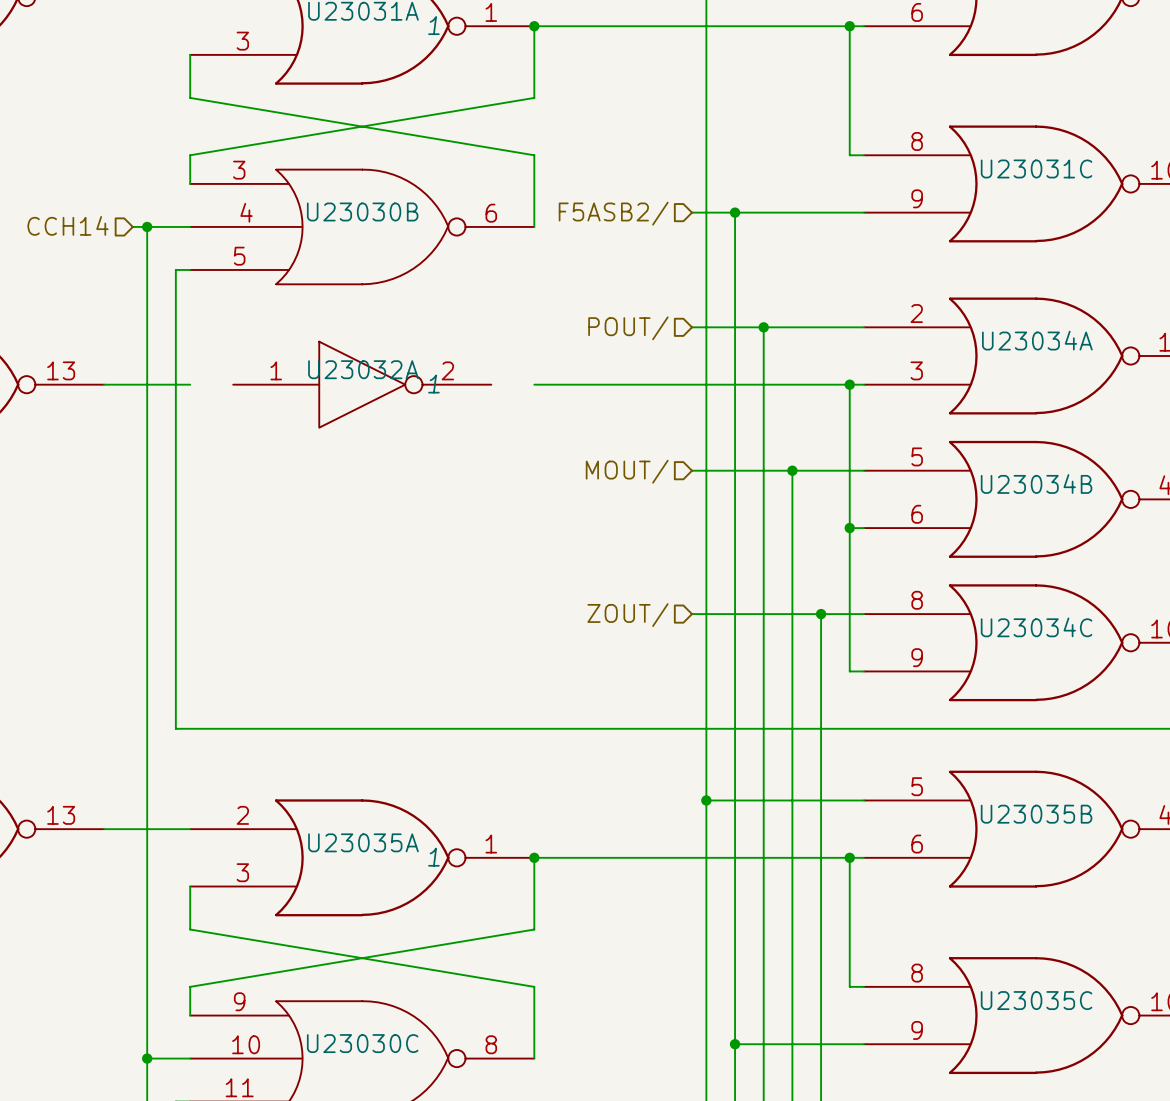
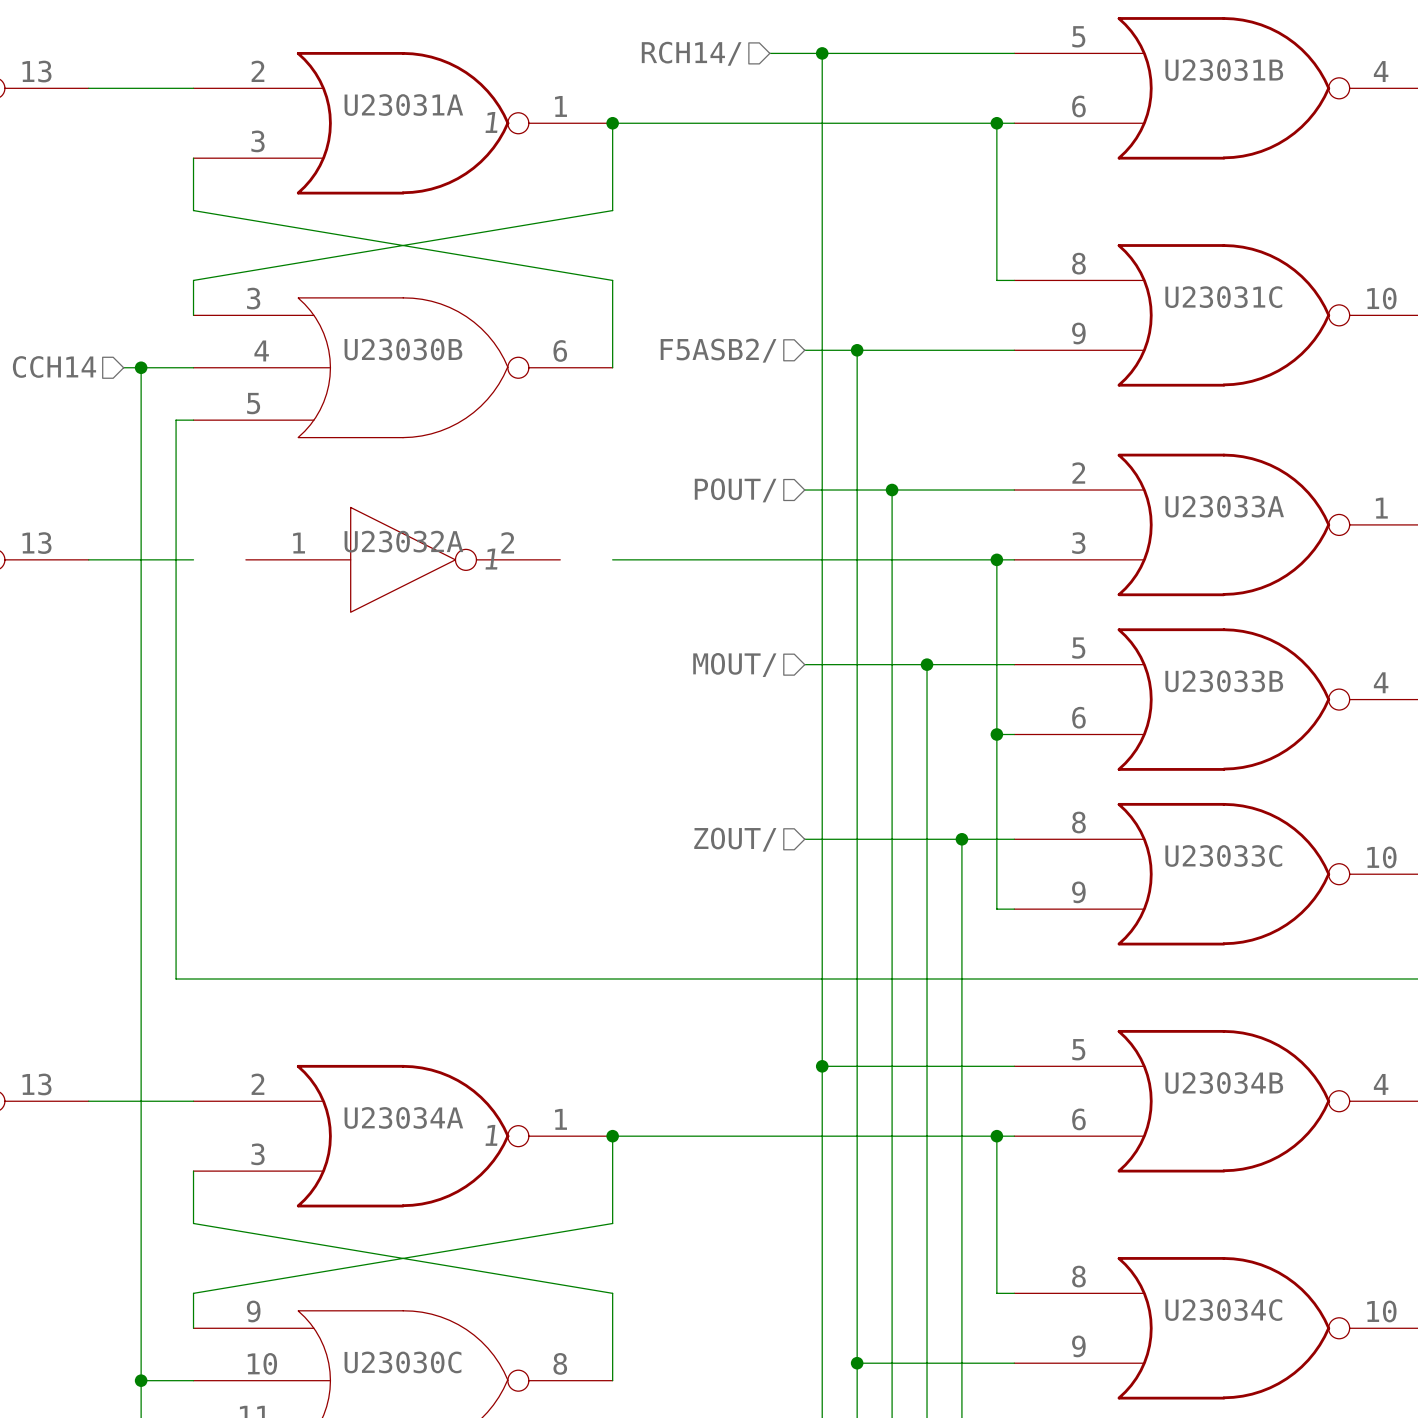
U23034A name: U23034A (1037, 340) -> U23033A (1224, 506)
U23034B name: U23034B (1036, 483) -> U23033B (1224, 681)
U23034C name: U23034C (1036, 627) -> U23033C (1223, 855)
U23035B name: U23035B (1036, 814) -> U23034B (1224, 1083)
U23035A name: U23035A (363, 842) -> U23034A (403, 1117)
U23035C name: U23035C (1036, 1000) -> U23034C (1223, 1310)

